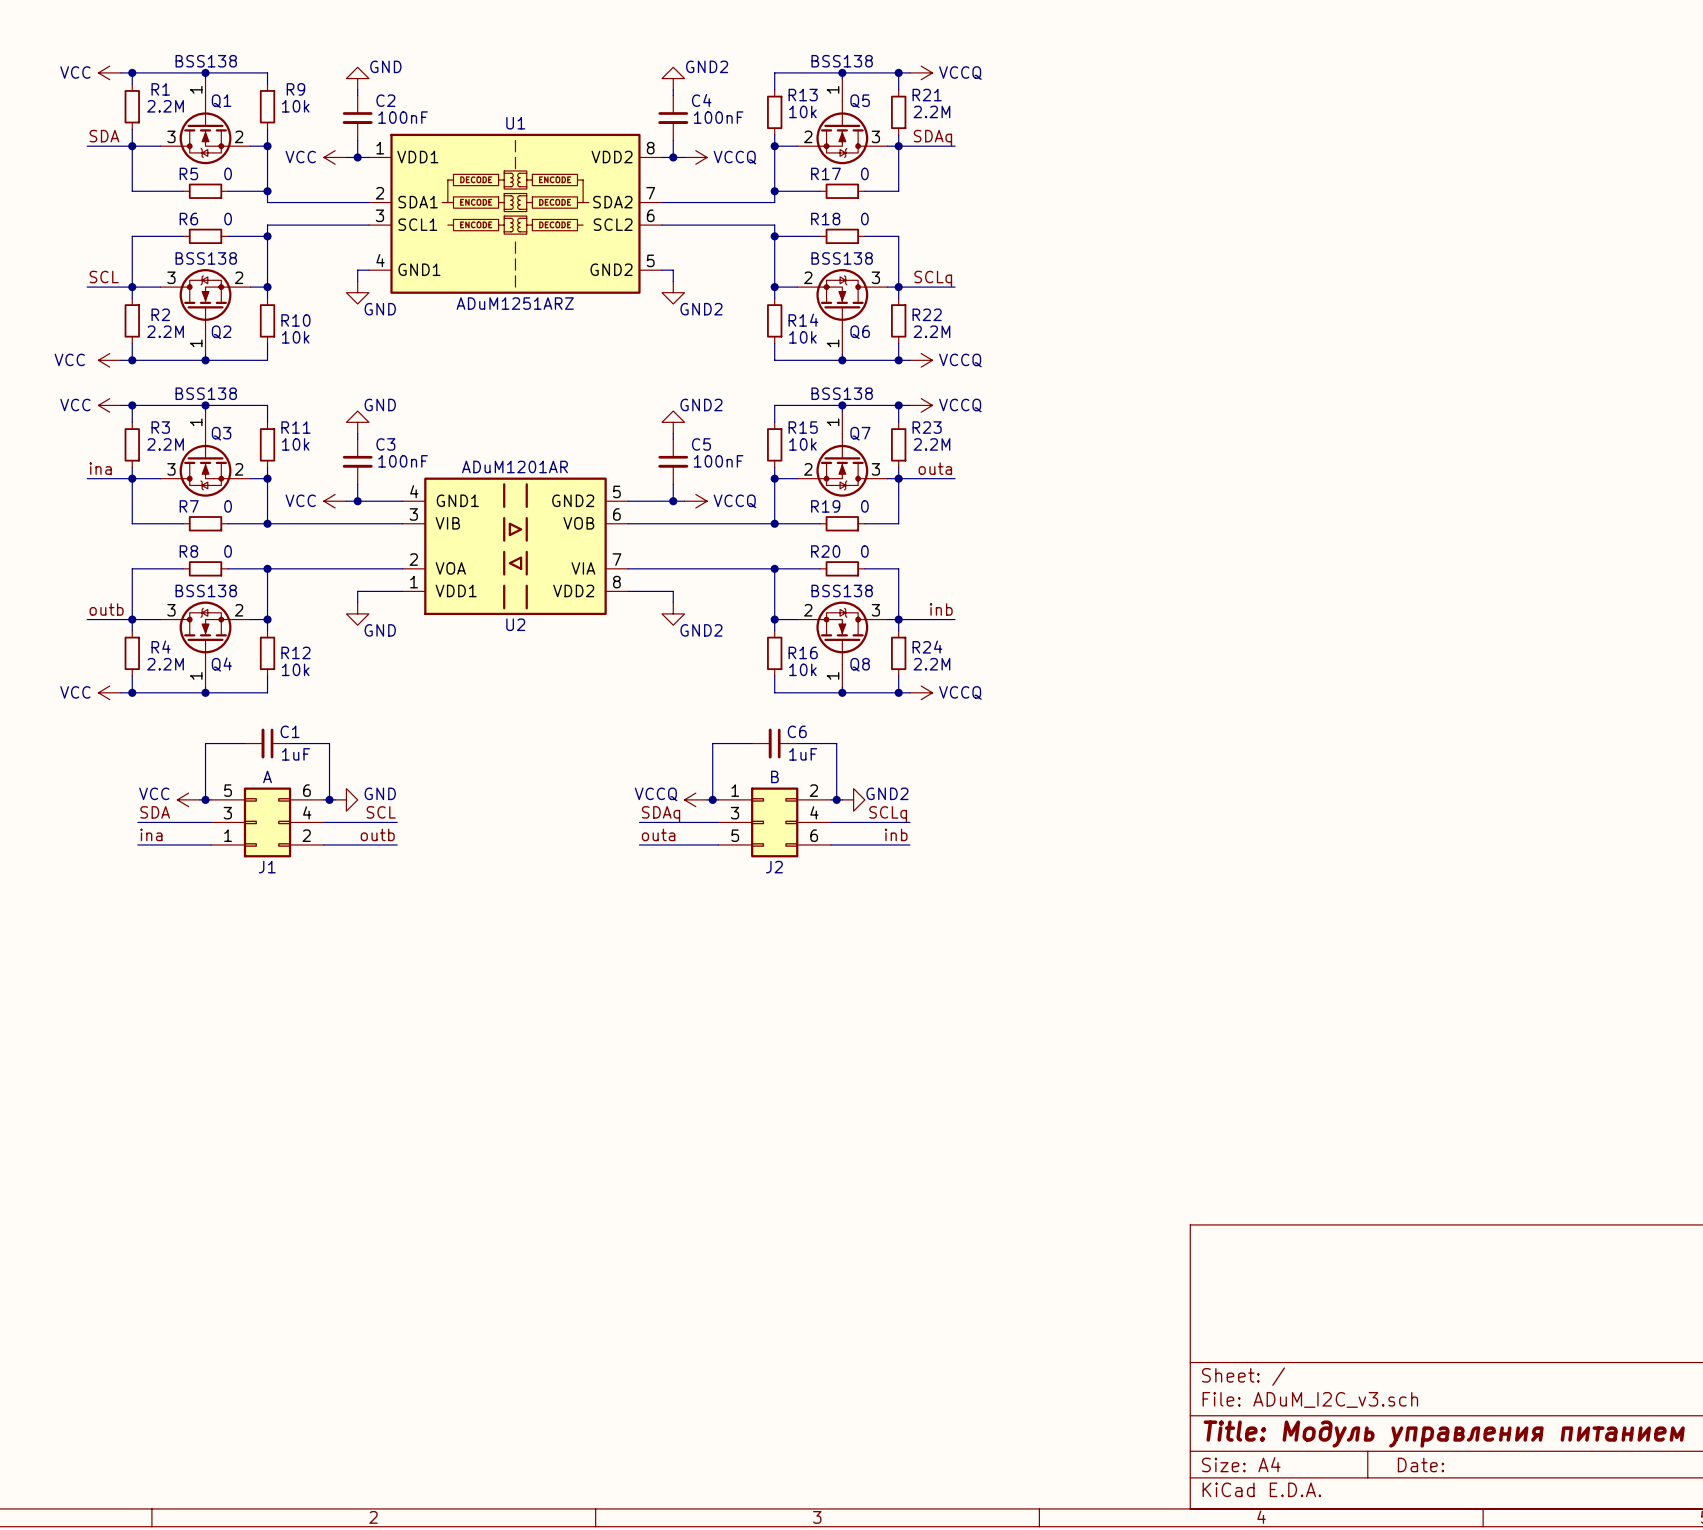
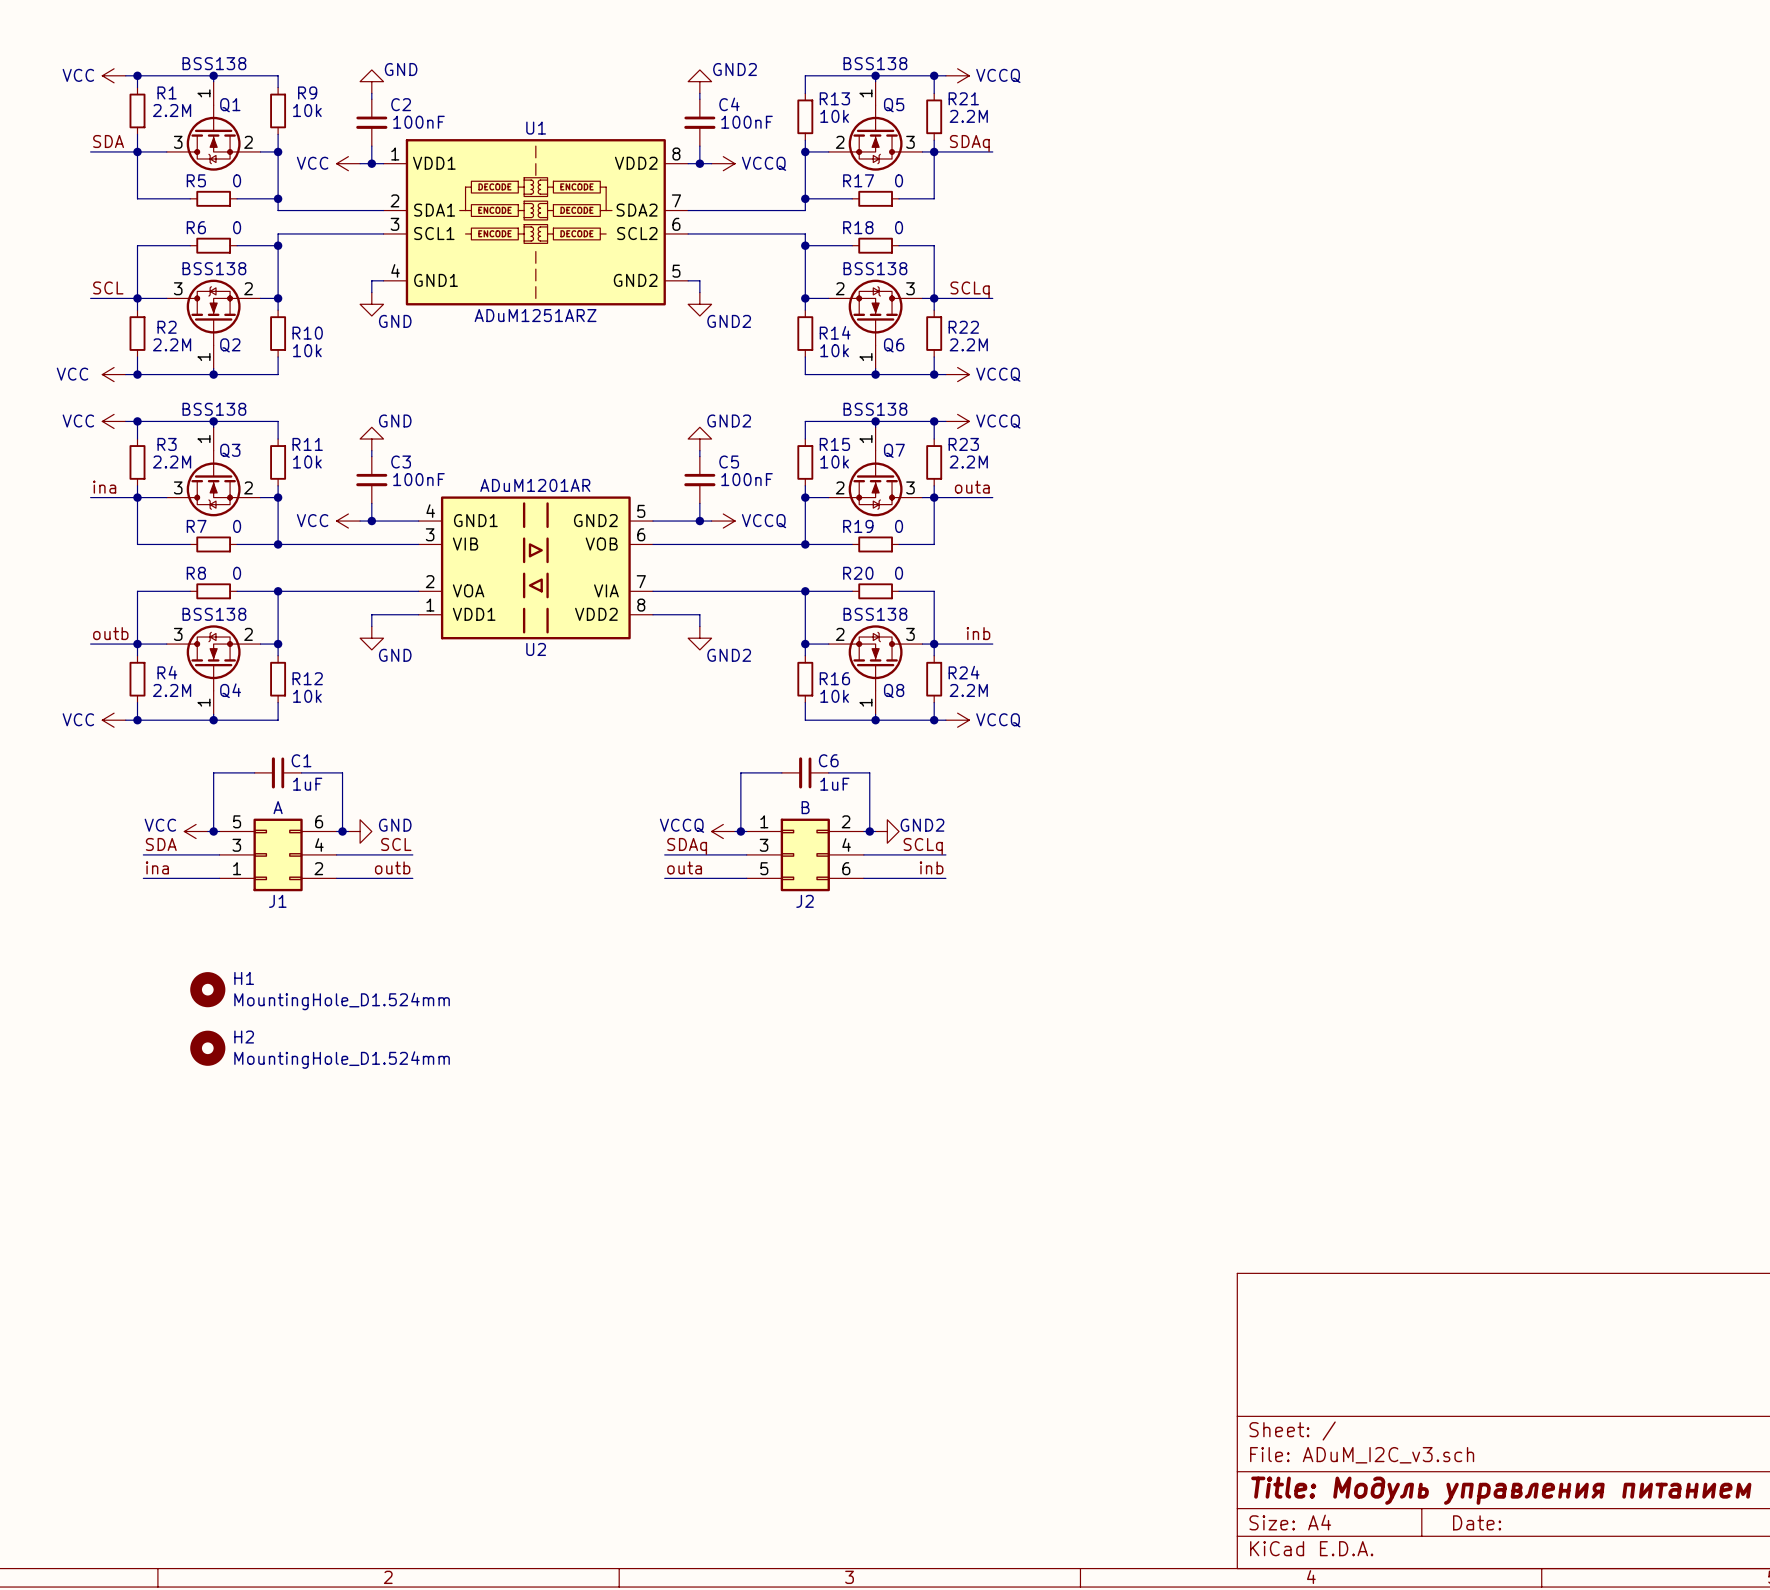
H1: none -> MountingHole_D1.524mm (207, 989)
H2: none -> MountingHole_D1.524mm (207, 1048)

